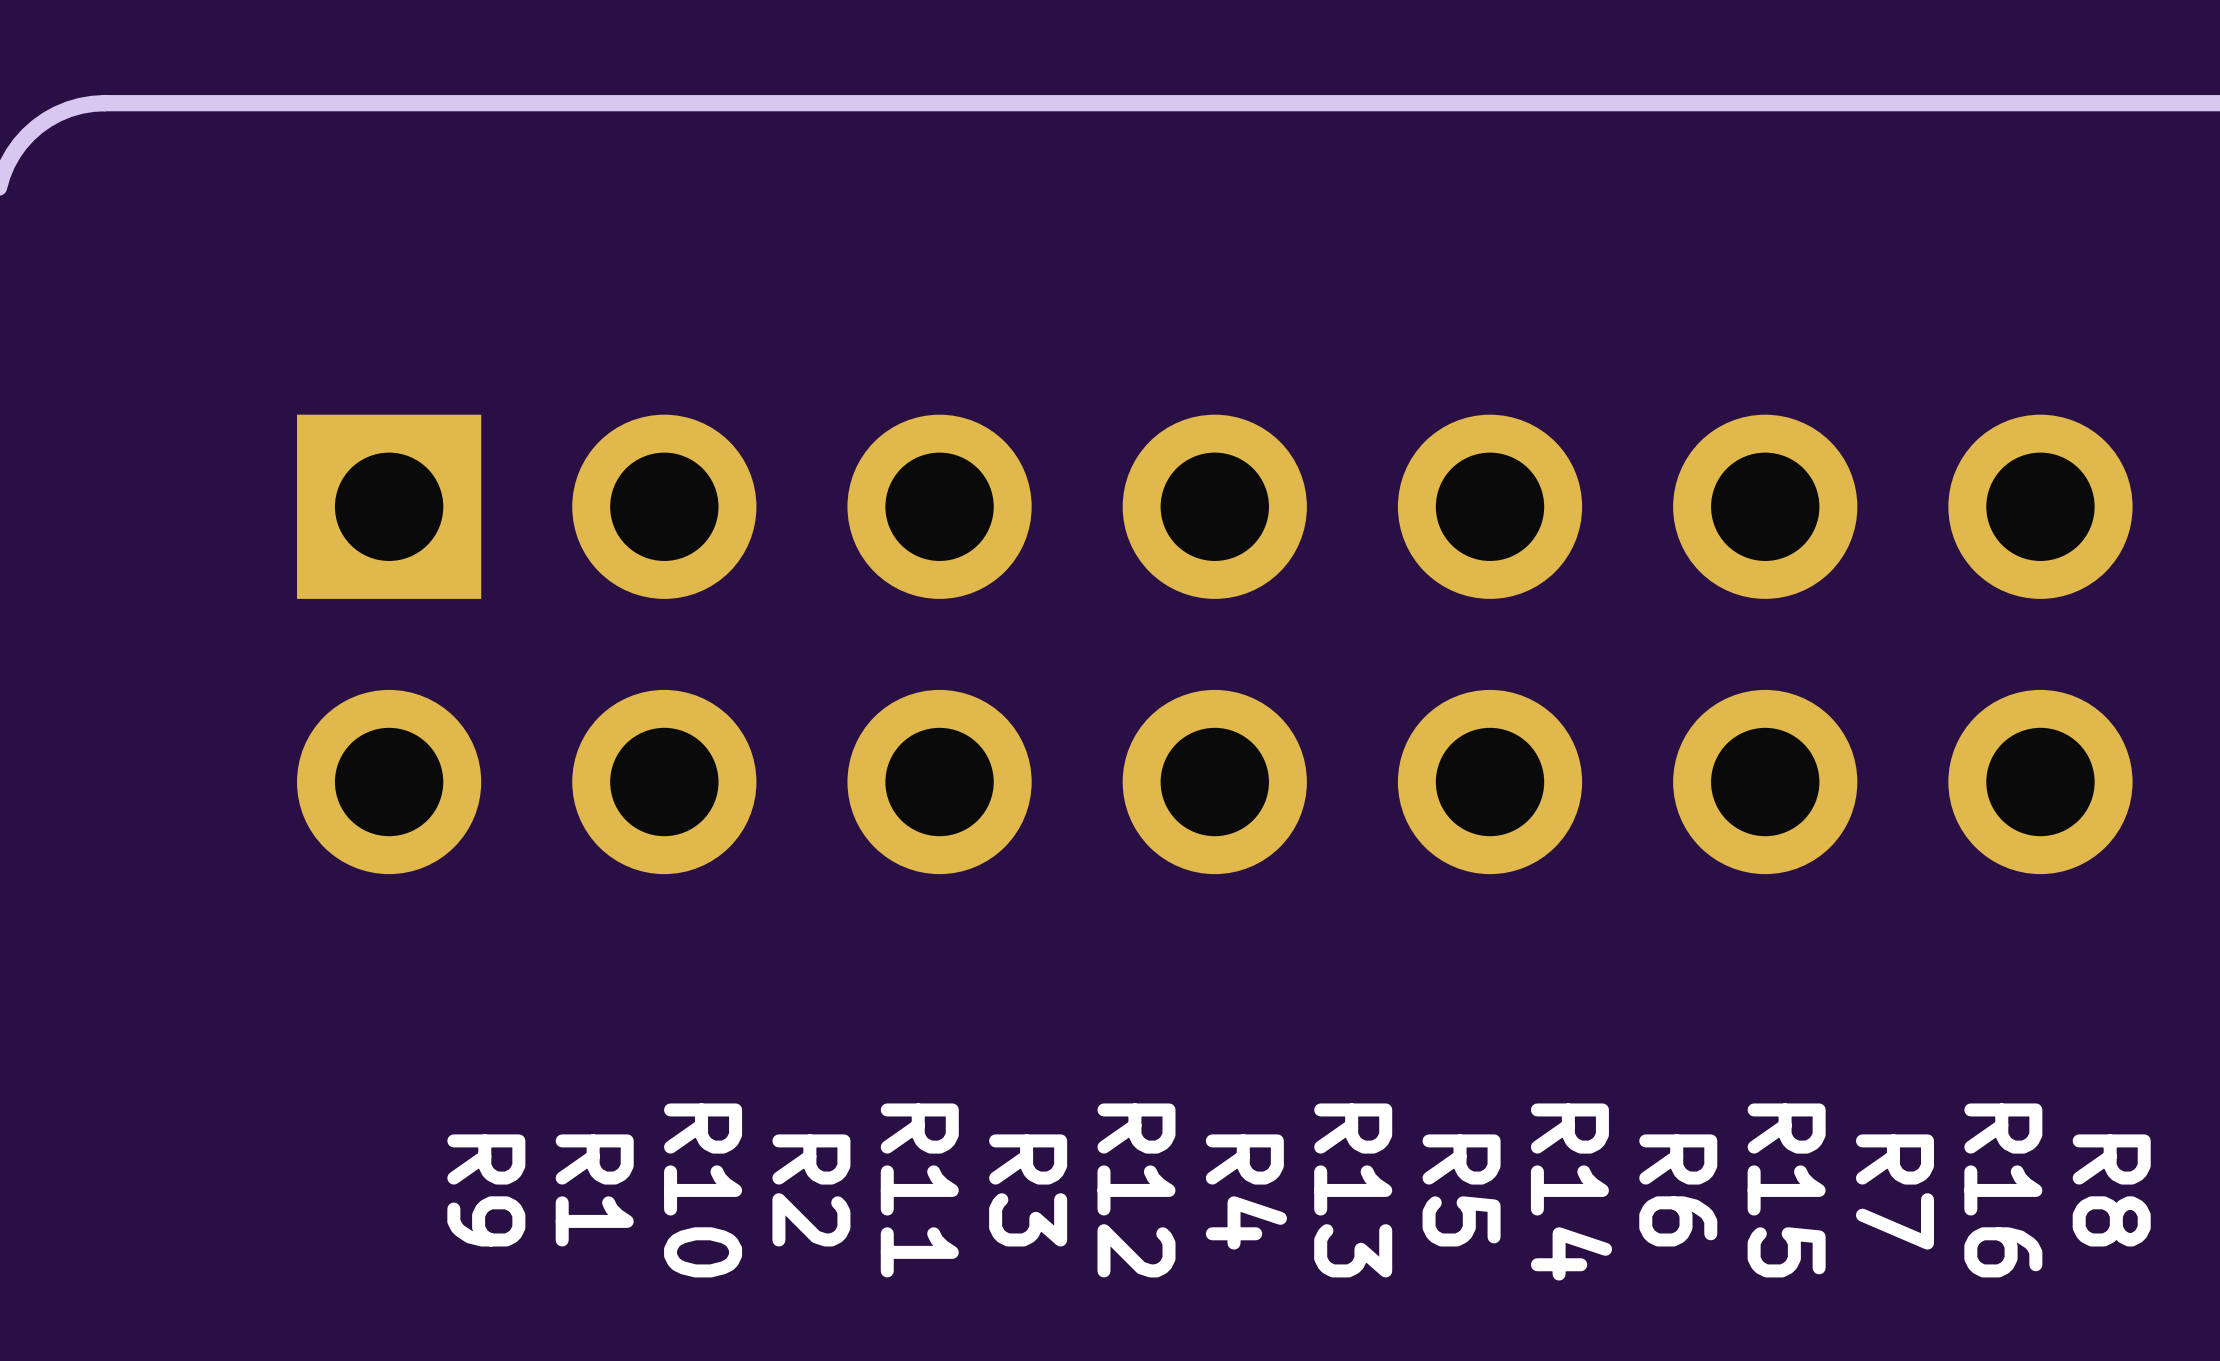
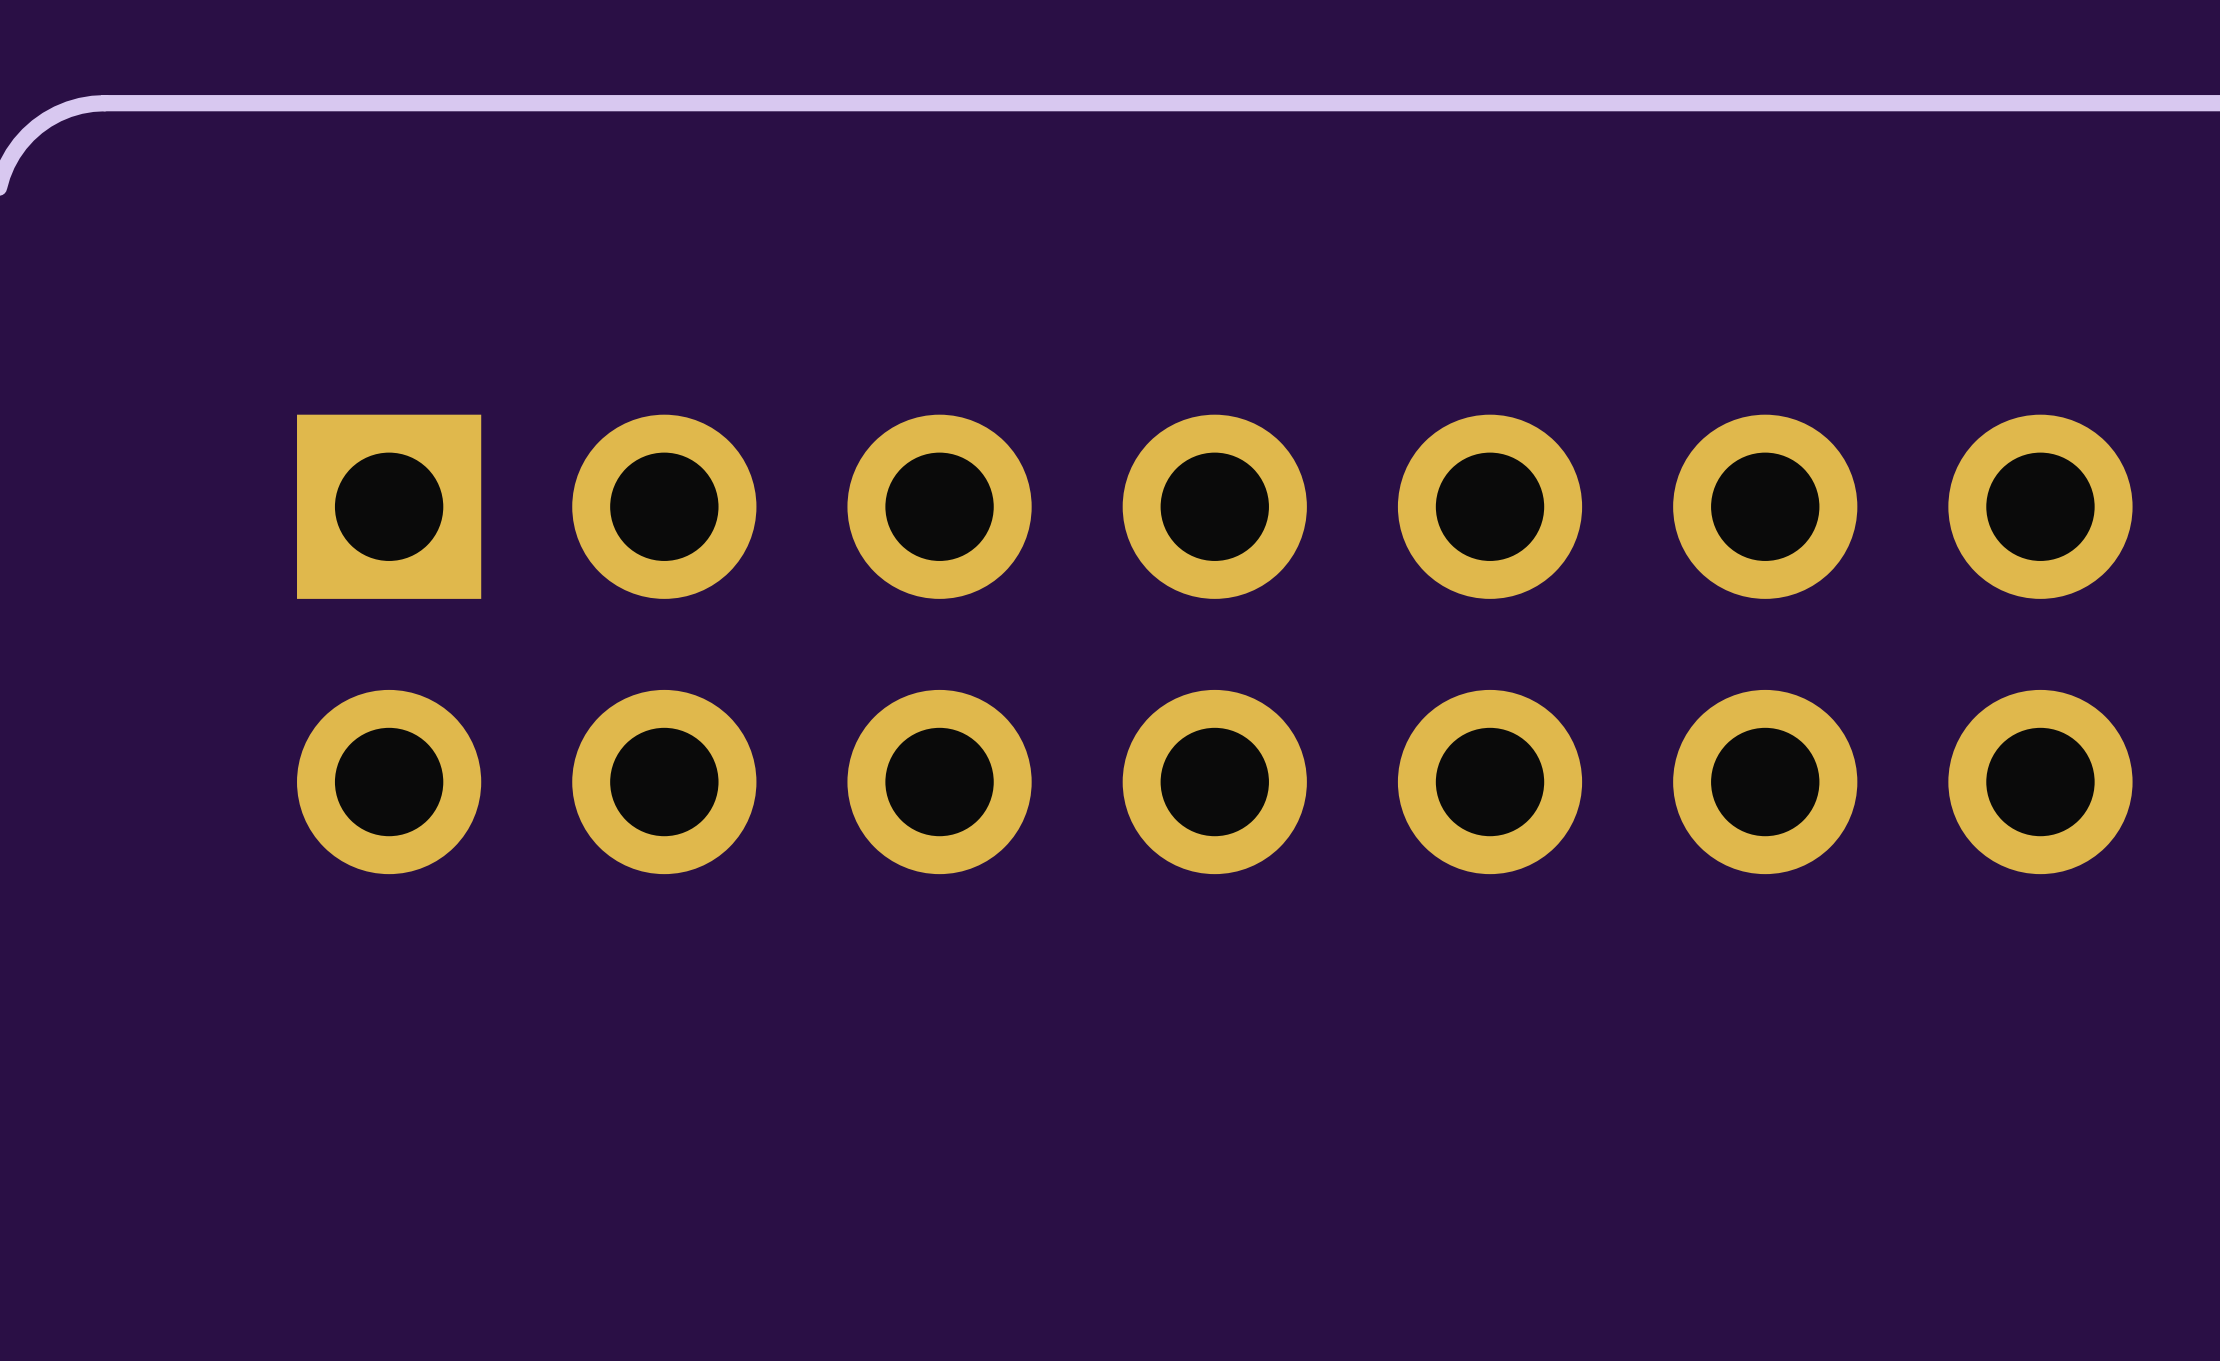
R9: (486, 1190) -> none
R1: (594, 1190) -> none
R10: (703, 1190) -> none
R2: (811, 1190) -> none
R11: (919, 1190) -> none
R3: (1028, 1190) -> none
R12: (1136, 1190) -> none
R13: (1353, 1190) -> none
R5: (1461, 1190) -> none
R6: (1678, 1190) -> none
R15: (1786, 1190) -> none
R16: (2003, 1190) -> none
R8: (2111, 1190) -> none
R4: (1246, 1191) -> none
R14: (1571, 1191) -> none
R7: (1894, 1191) -> none

